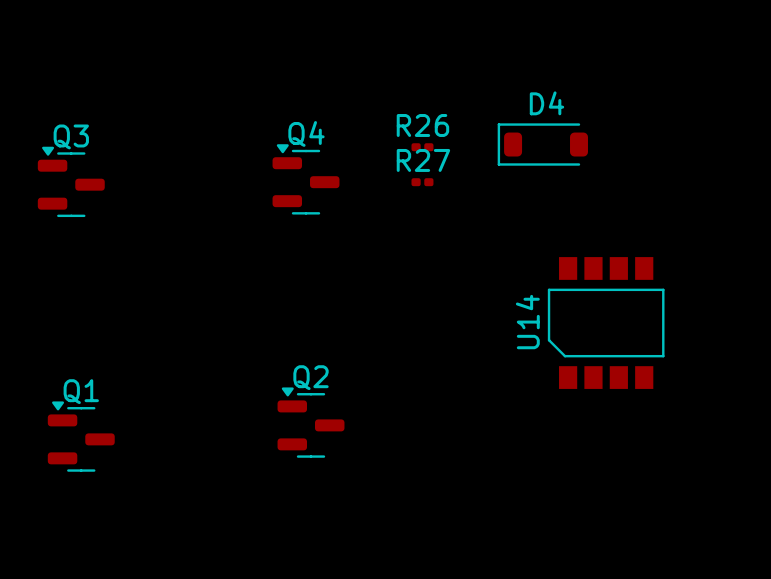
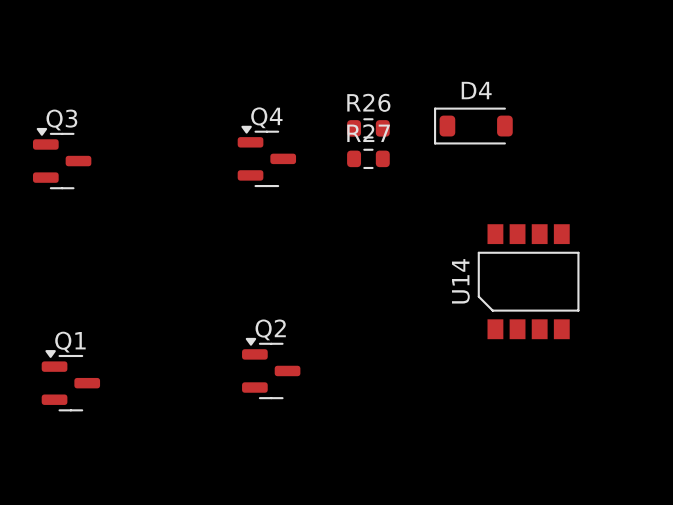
R26 footprint: [411, 143, 434, 152] -> [347, 118, 390, 139]
R27 footprint: [411, 178, 434, 187] -> [347, 148, 390, 170]

